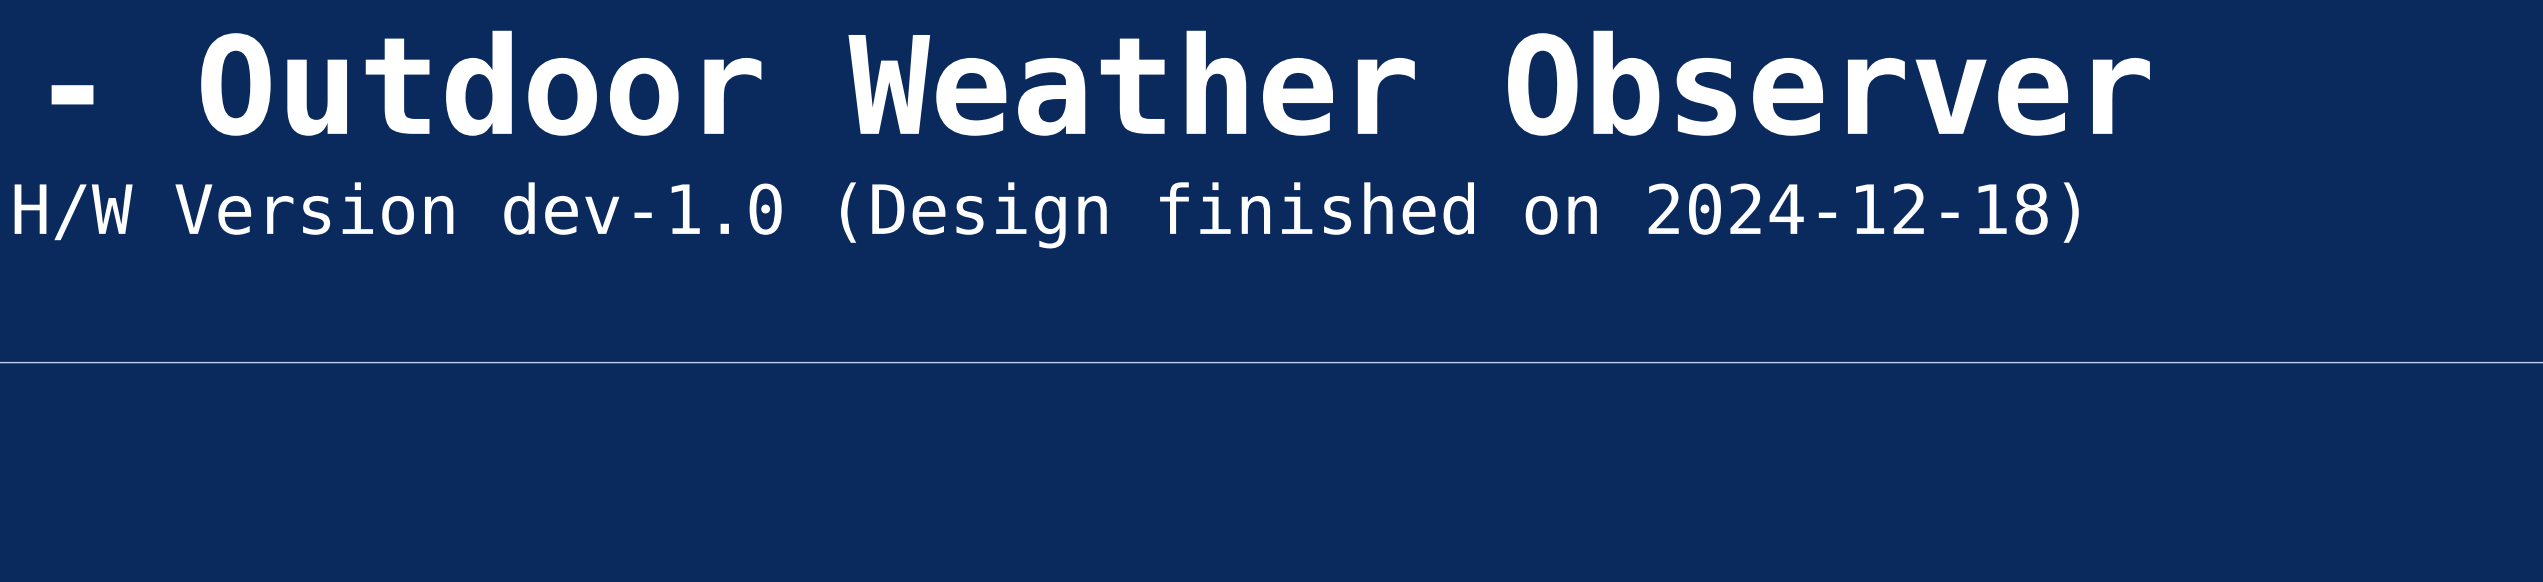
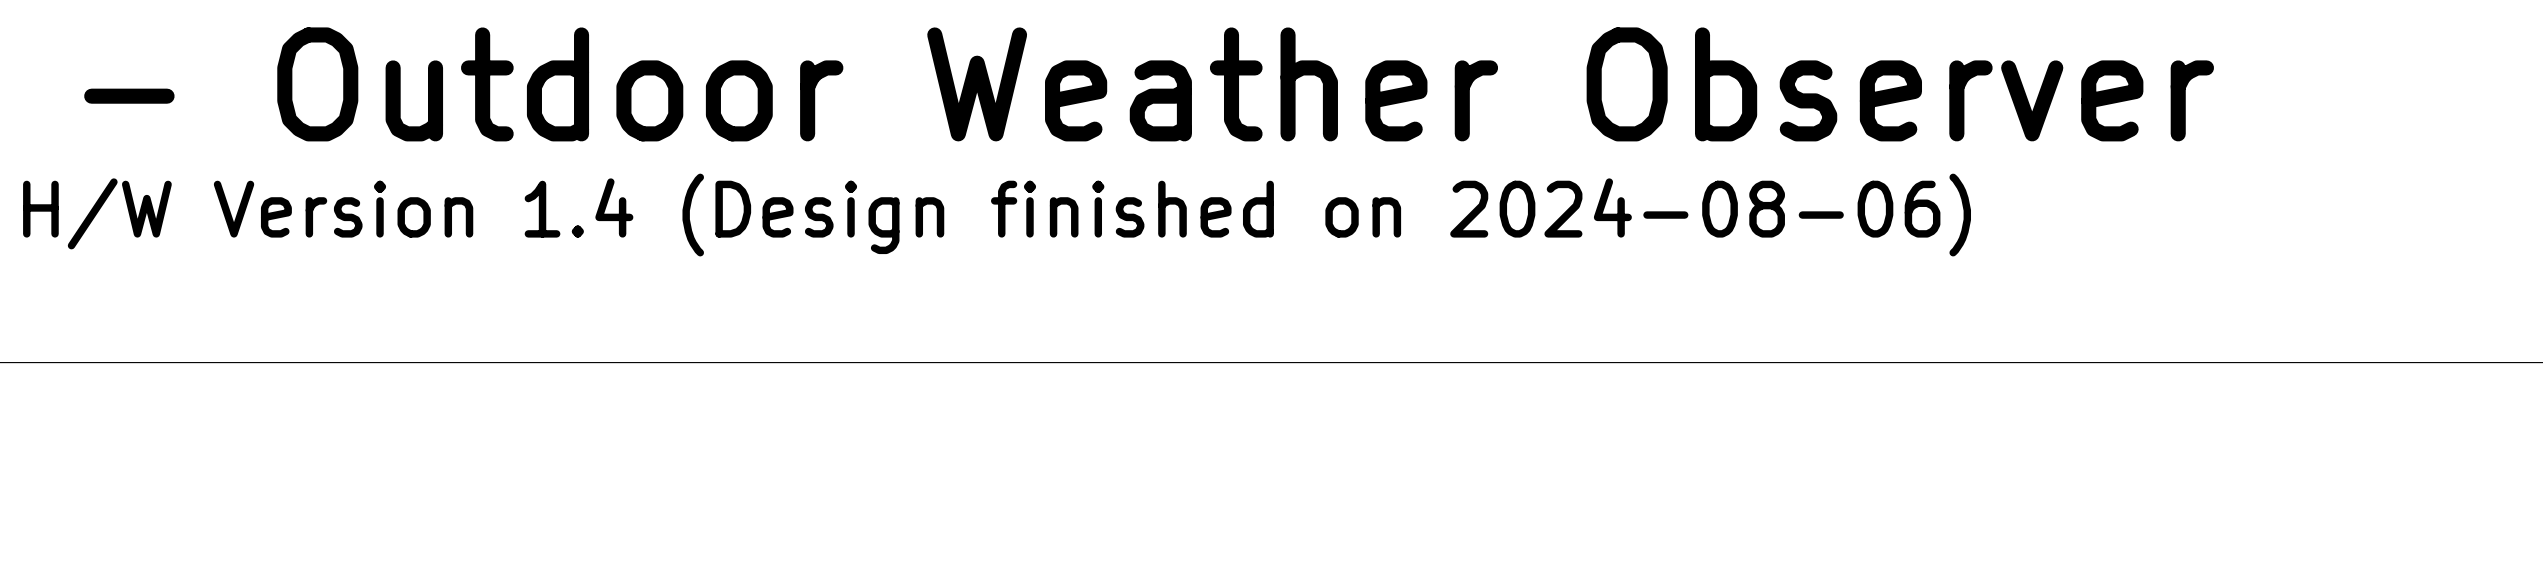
text: H/W Version dev-1.0 (Design finished on 2024-12-18) (1046, 215) -> H/W Version 1.4 (Design finished on 2024-08-06) (997, 215)

